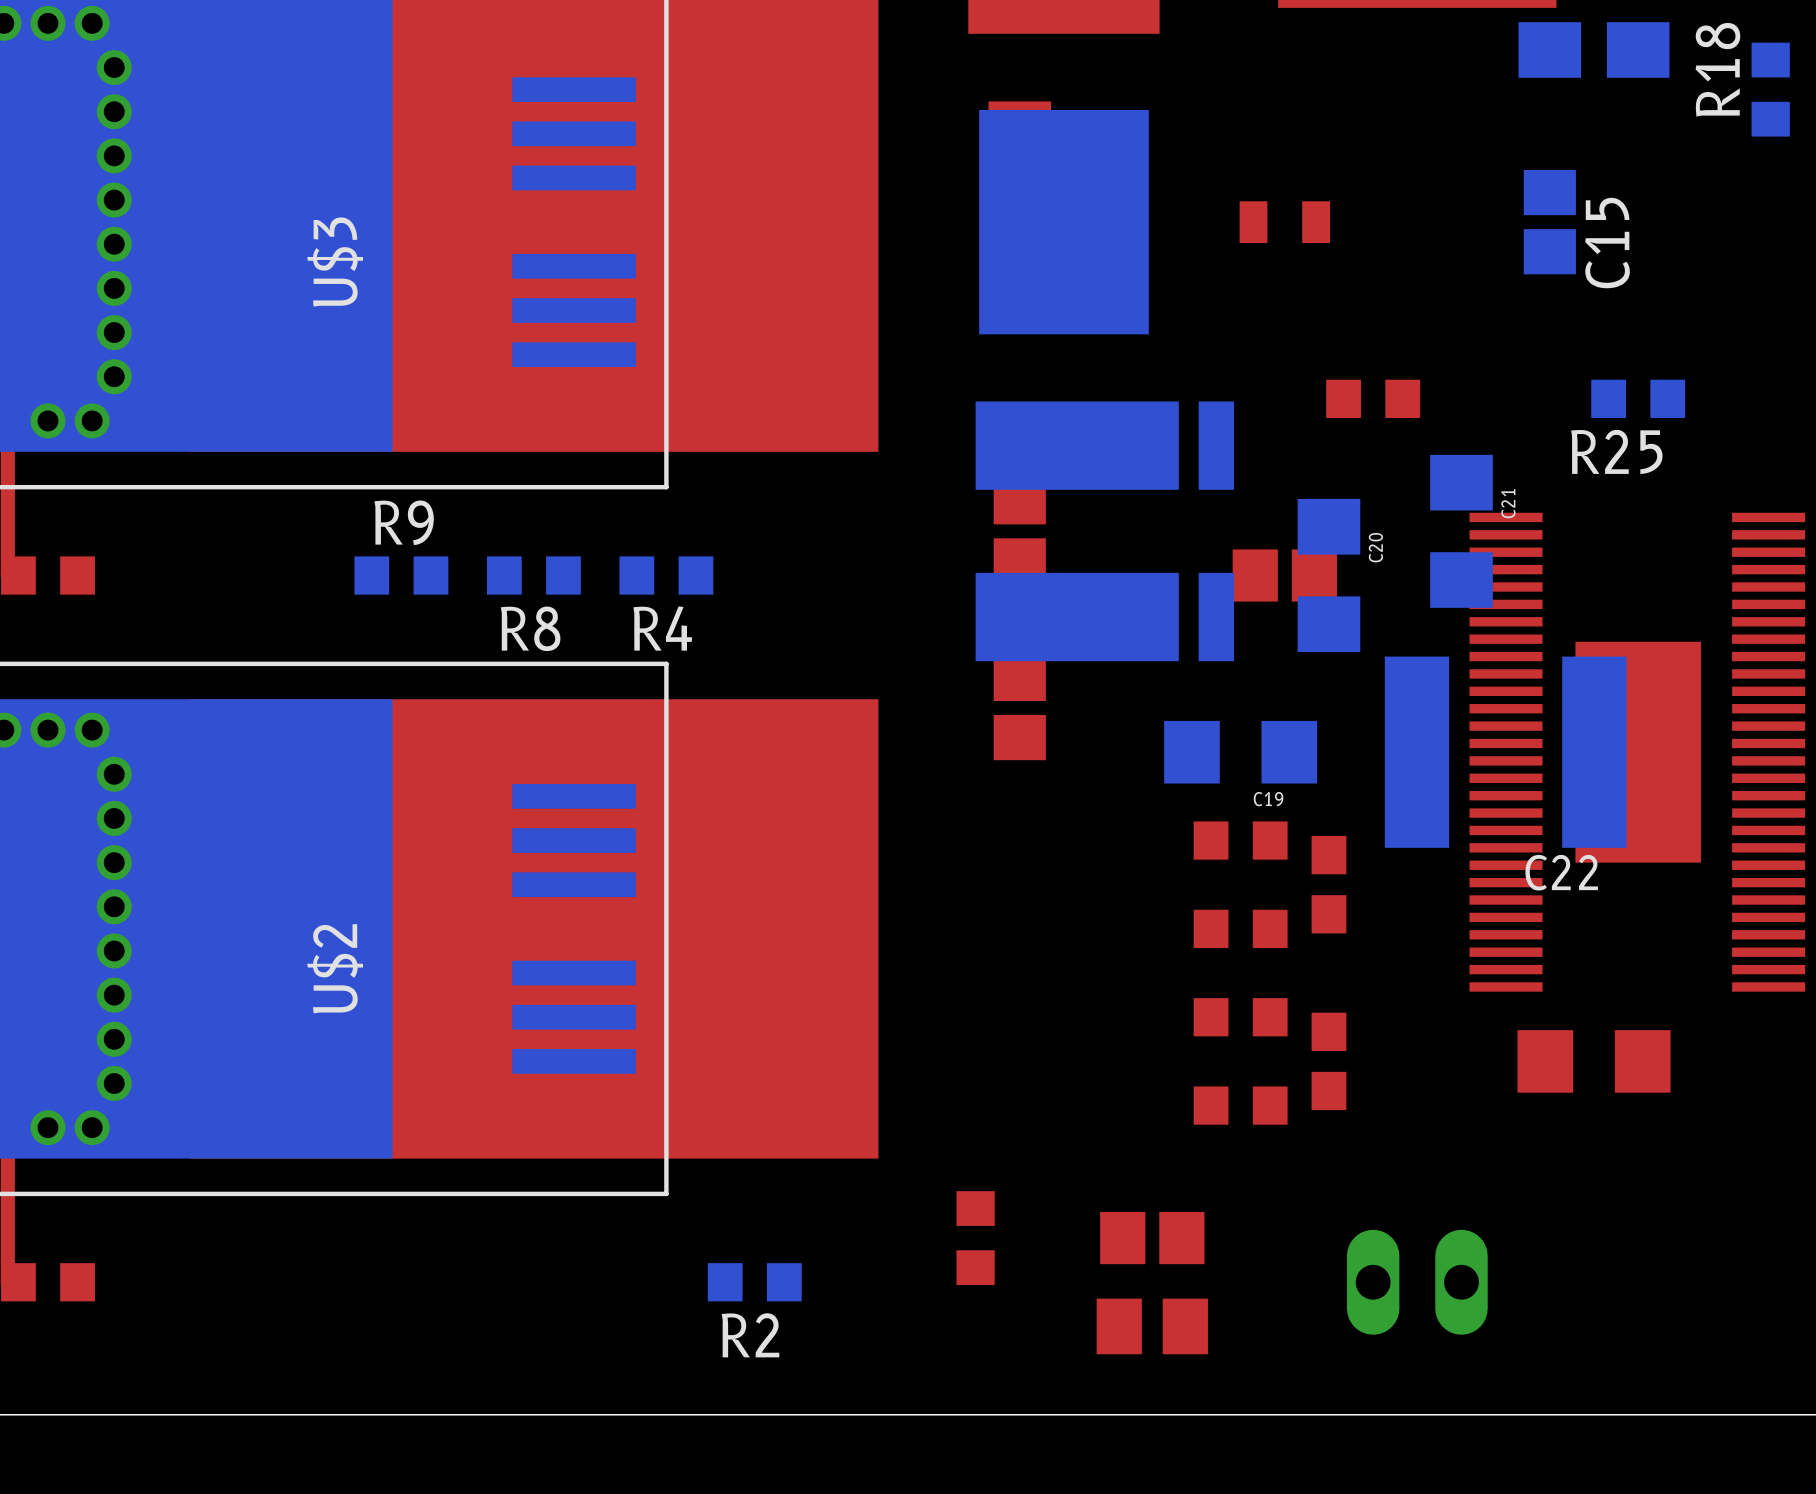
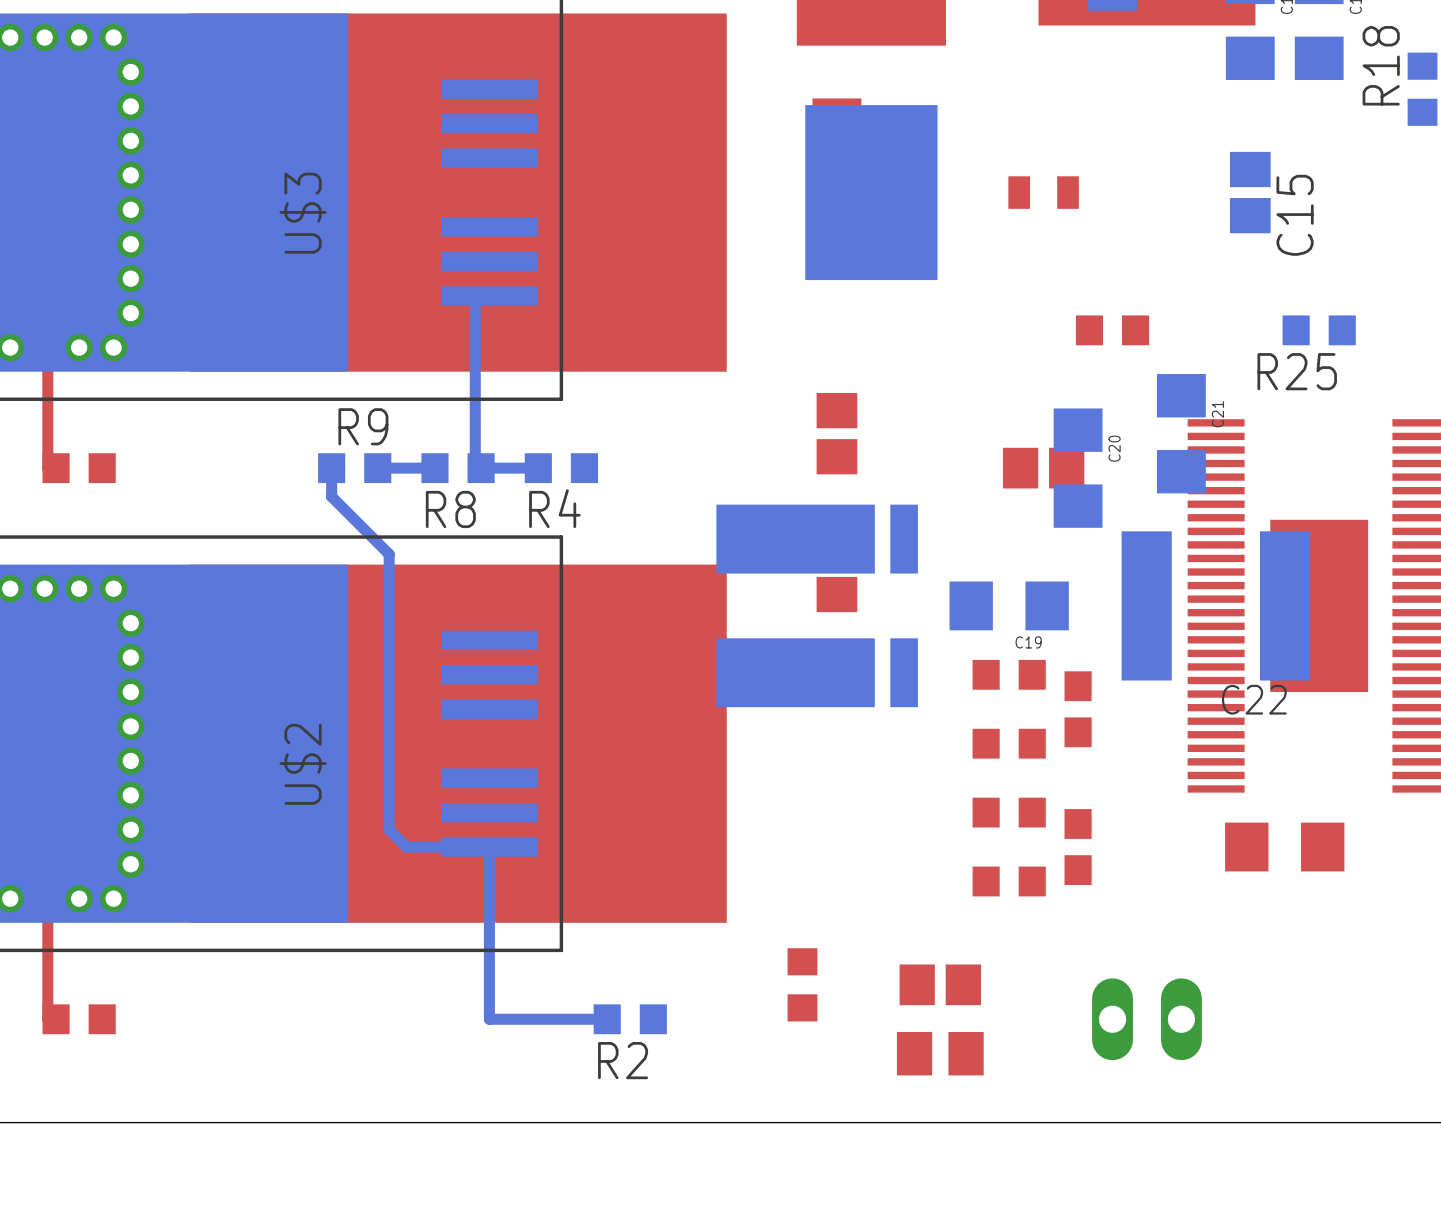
bottom track: none -> (489, 295) (475, 295) (475, 468) (538, 468)
part position: (1104, 531) -> (817, 605)
bottom track: none -> (331, 468) (331, 496) (389, 554) (389, 829) (406, 847) (489, 847) (489, 1019) (607, 1019)
bottom track: none -> (435, 468) (377, 468)

